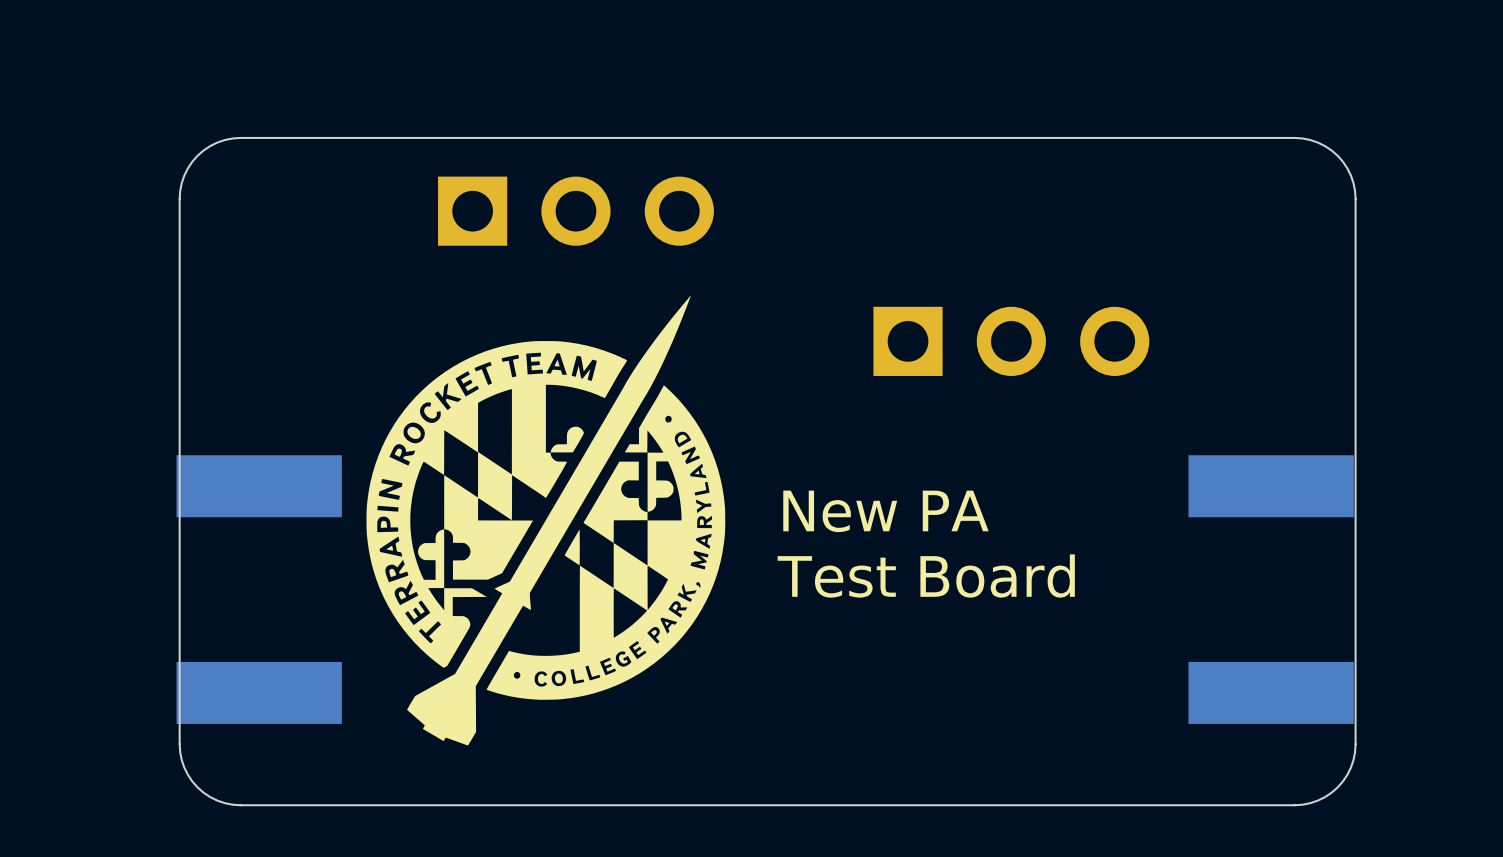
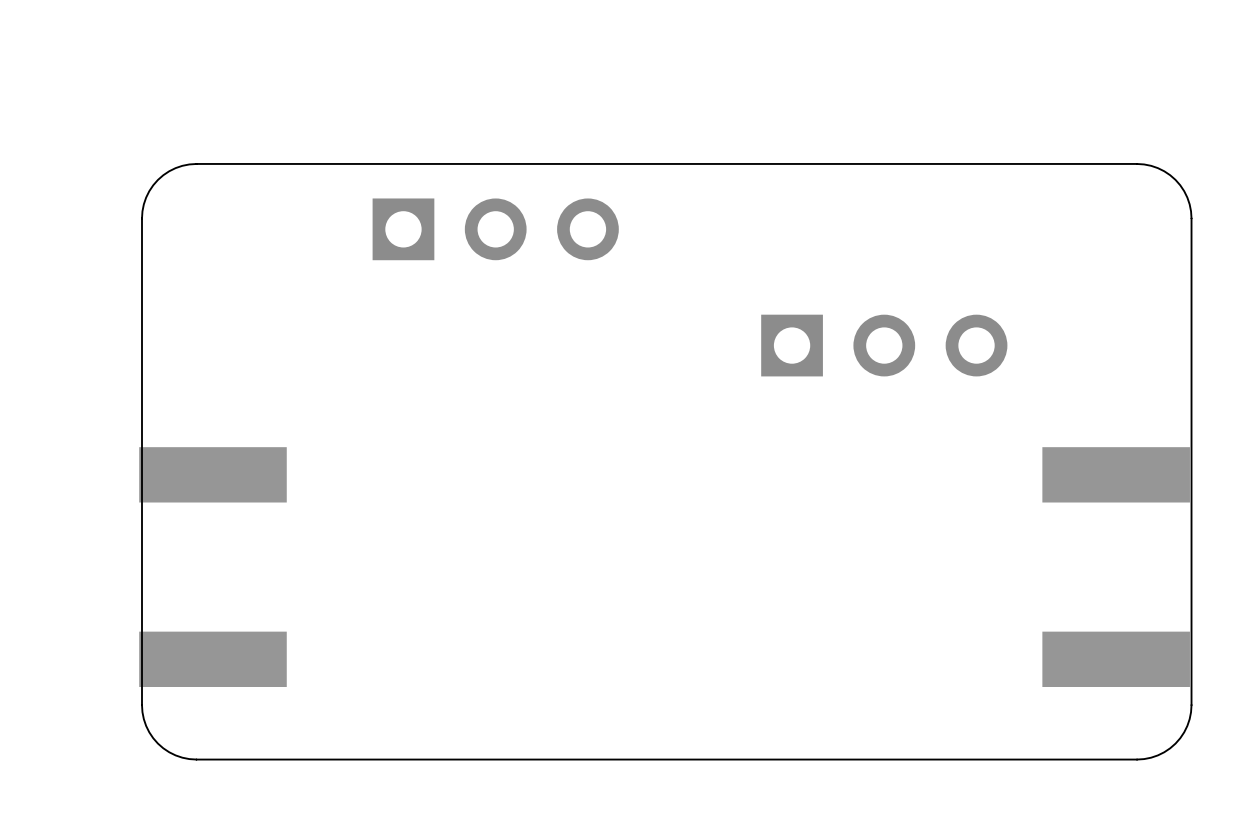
drawing: [366, 295, 726, 746] -> none
text: New PA (885, 511) -> none
text: Test Board (926, 576) -> none

